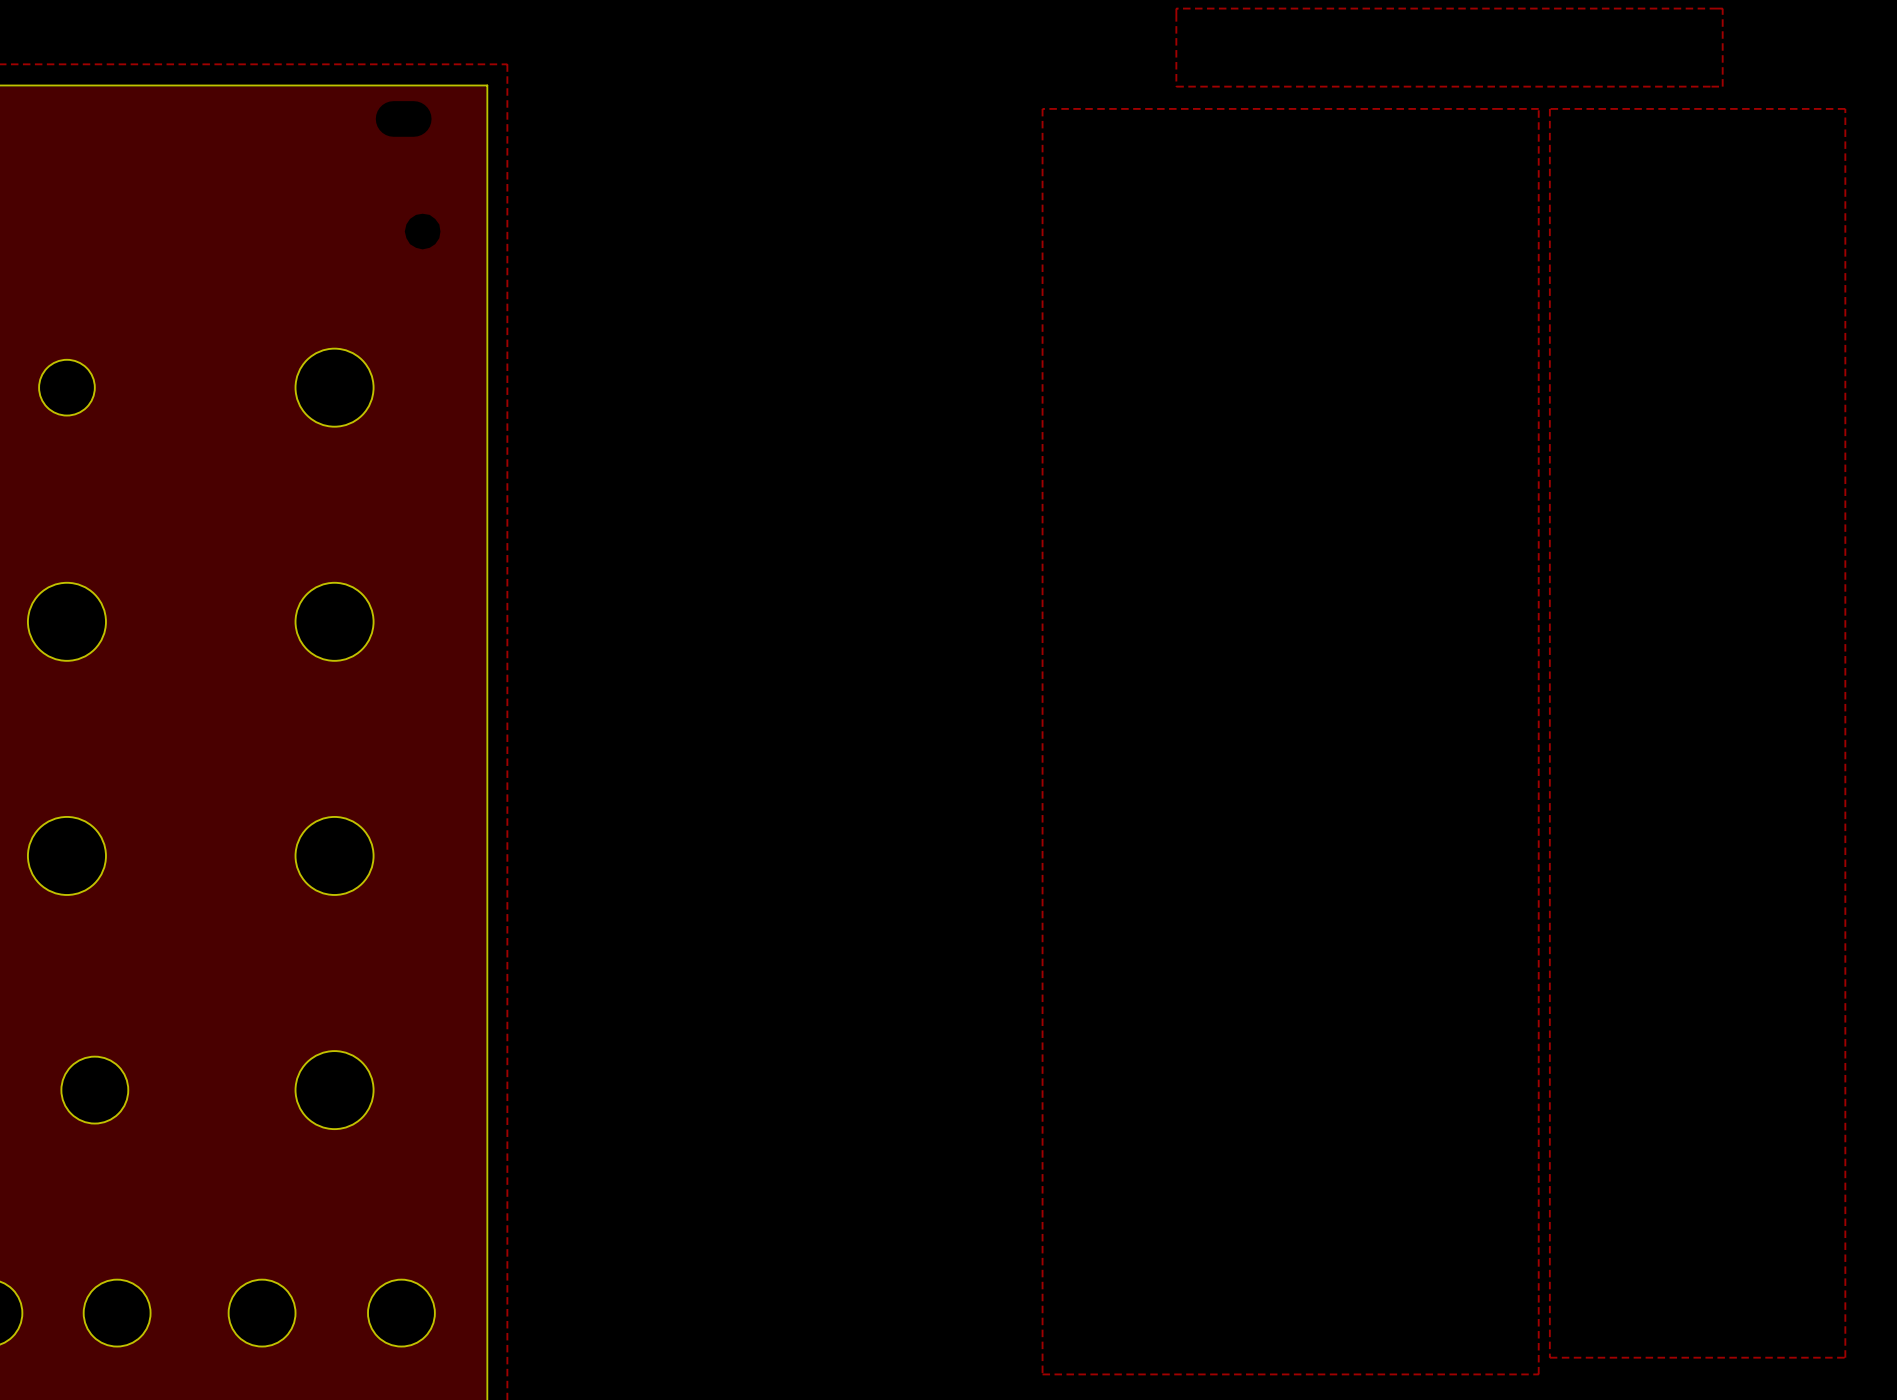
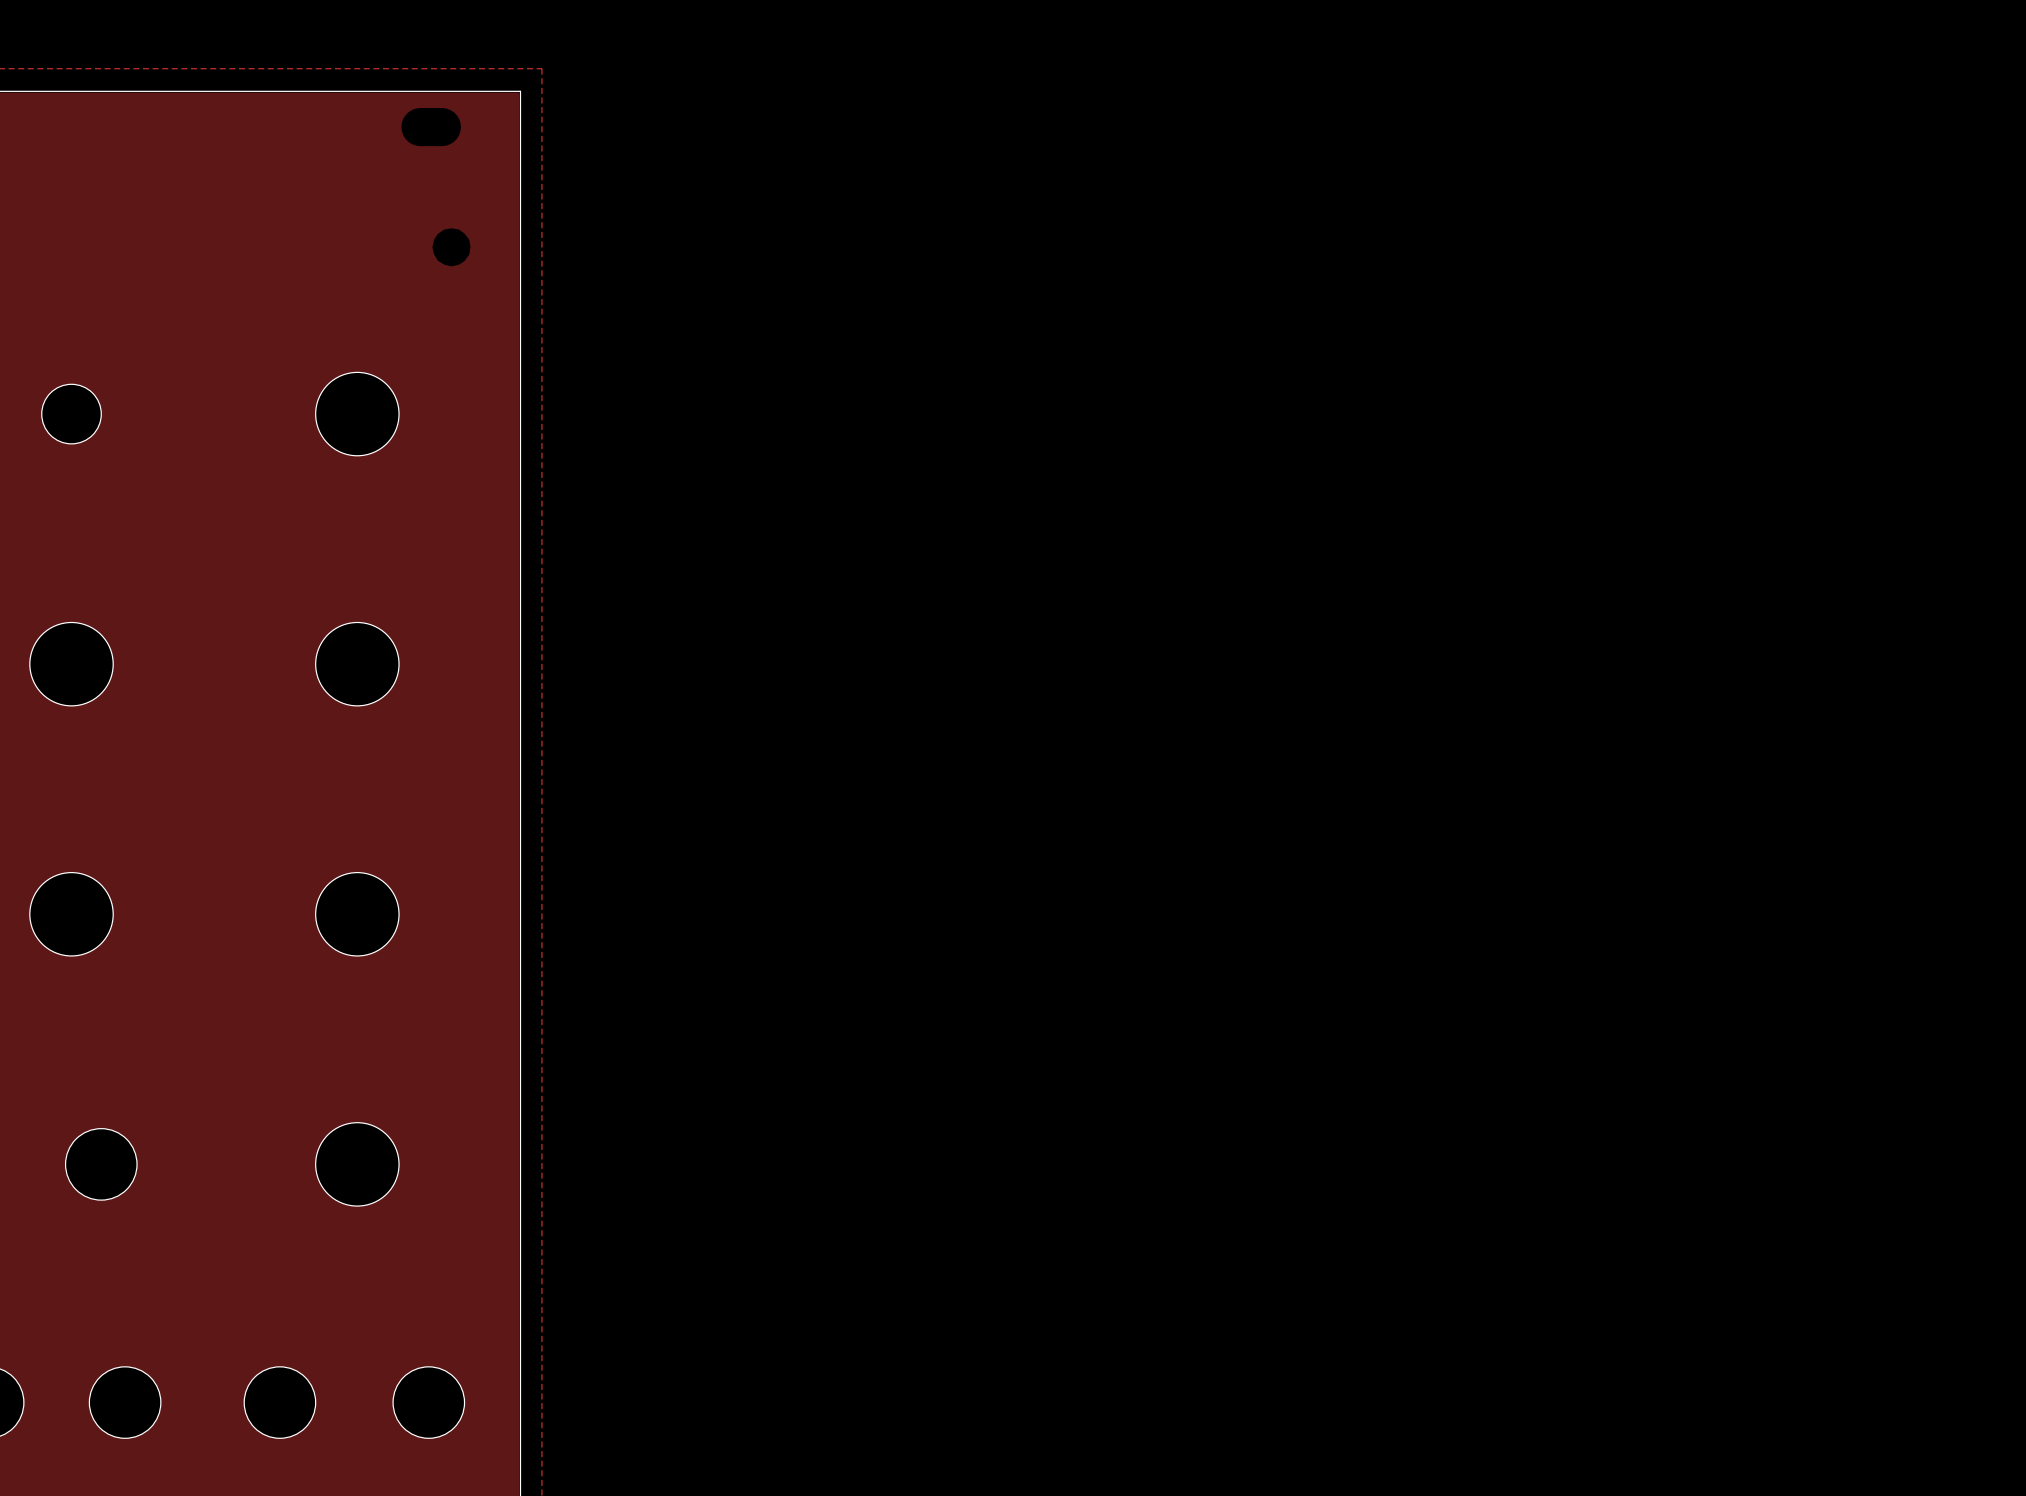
zone outline: (1176, 8) (1176, 86) (1722, 86) (1722, 8) (1176, 8) -> none
zone outline: (1042, 108) (1538, 108) (1538, 1374) (1042, 1374) (1042, 108) -> none
zone outline: (1549, 108) (1845, 108) (1845, 1357) (1549, 1357) (1549, 108) -> none

